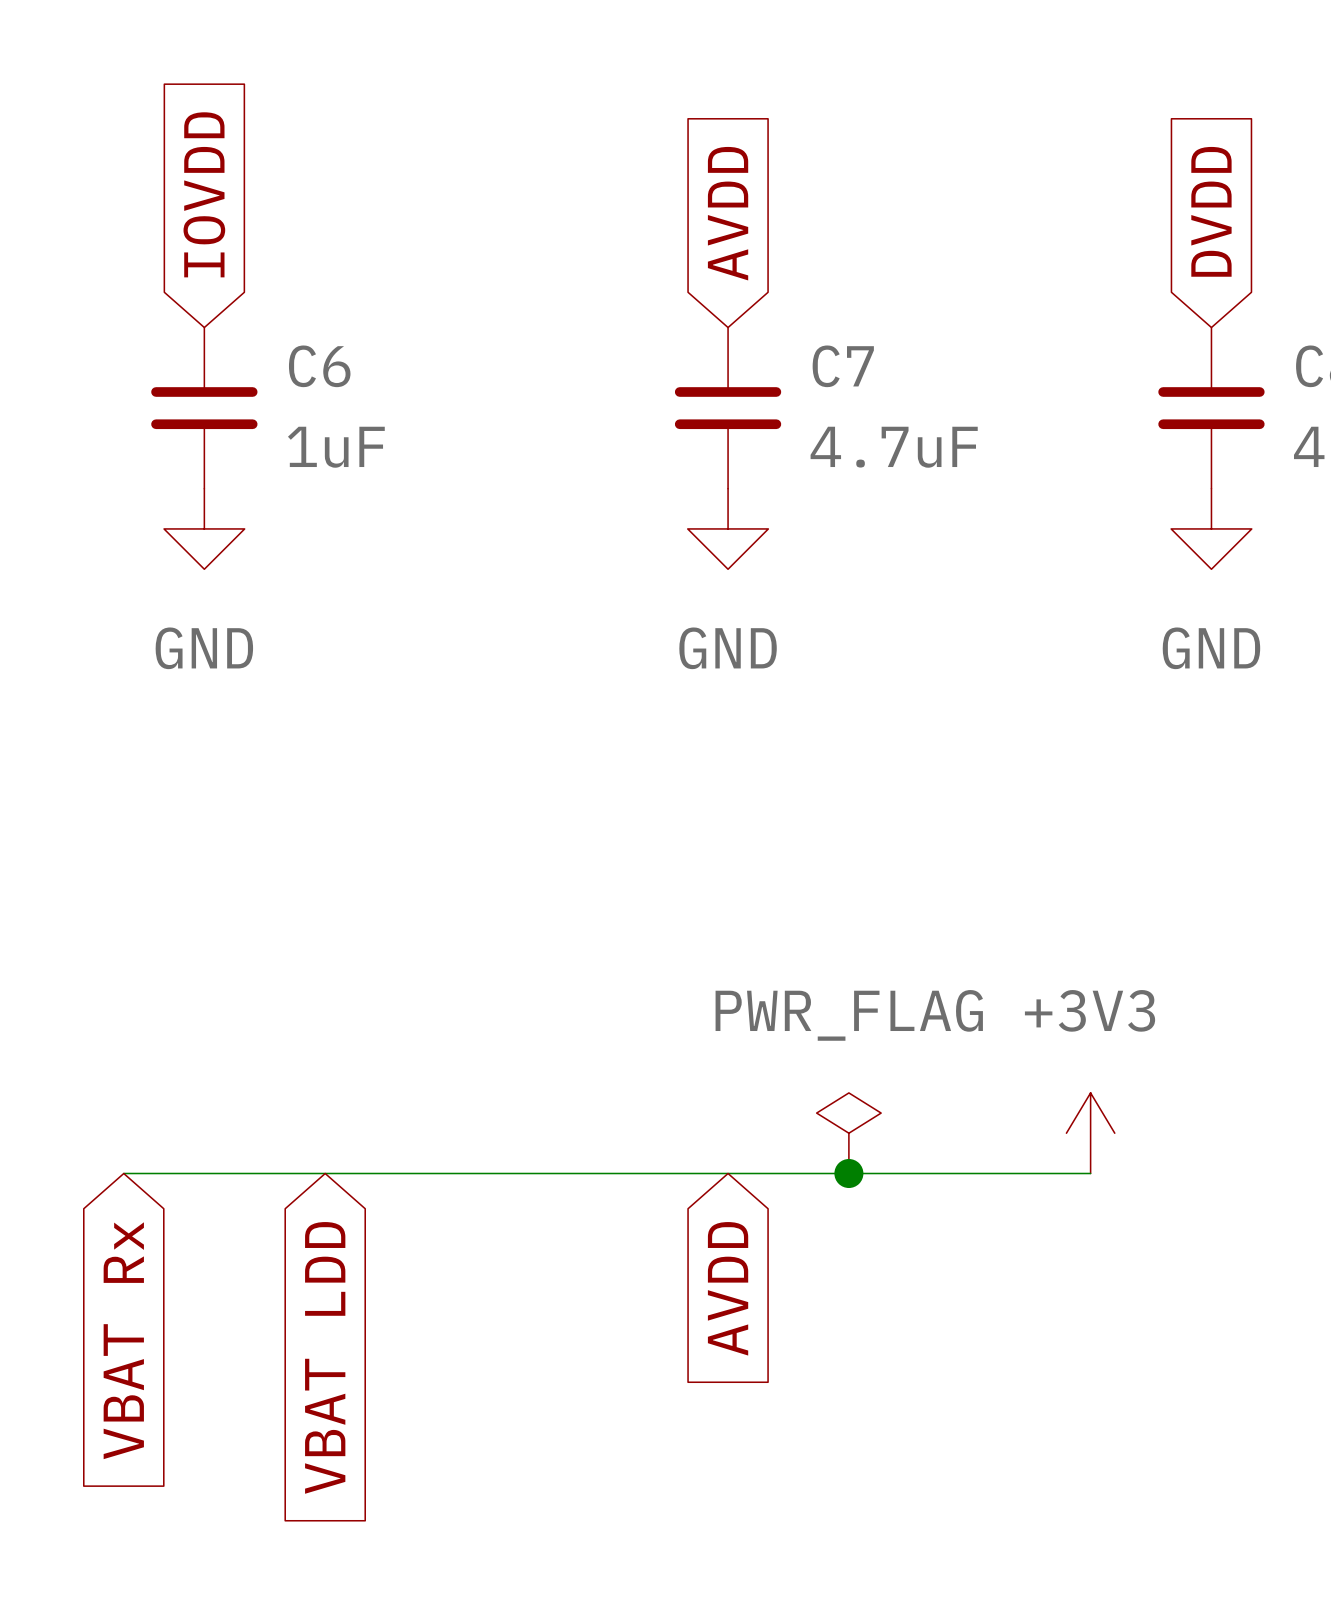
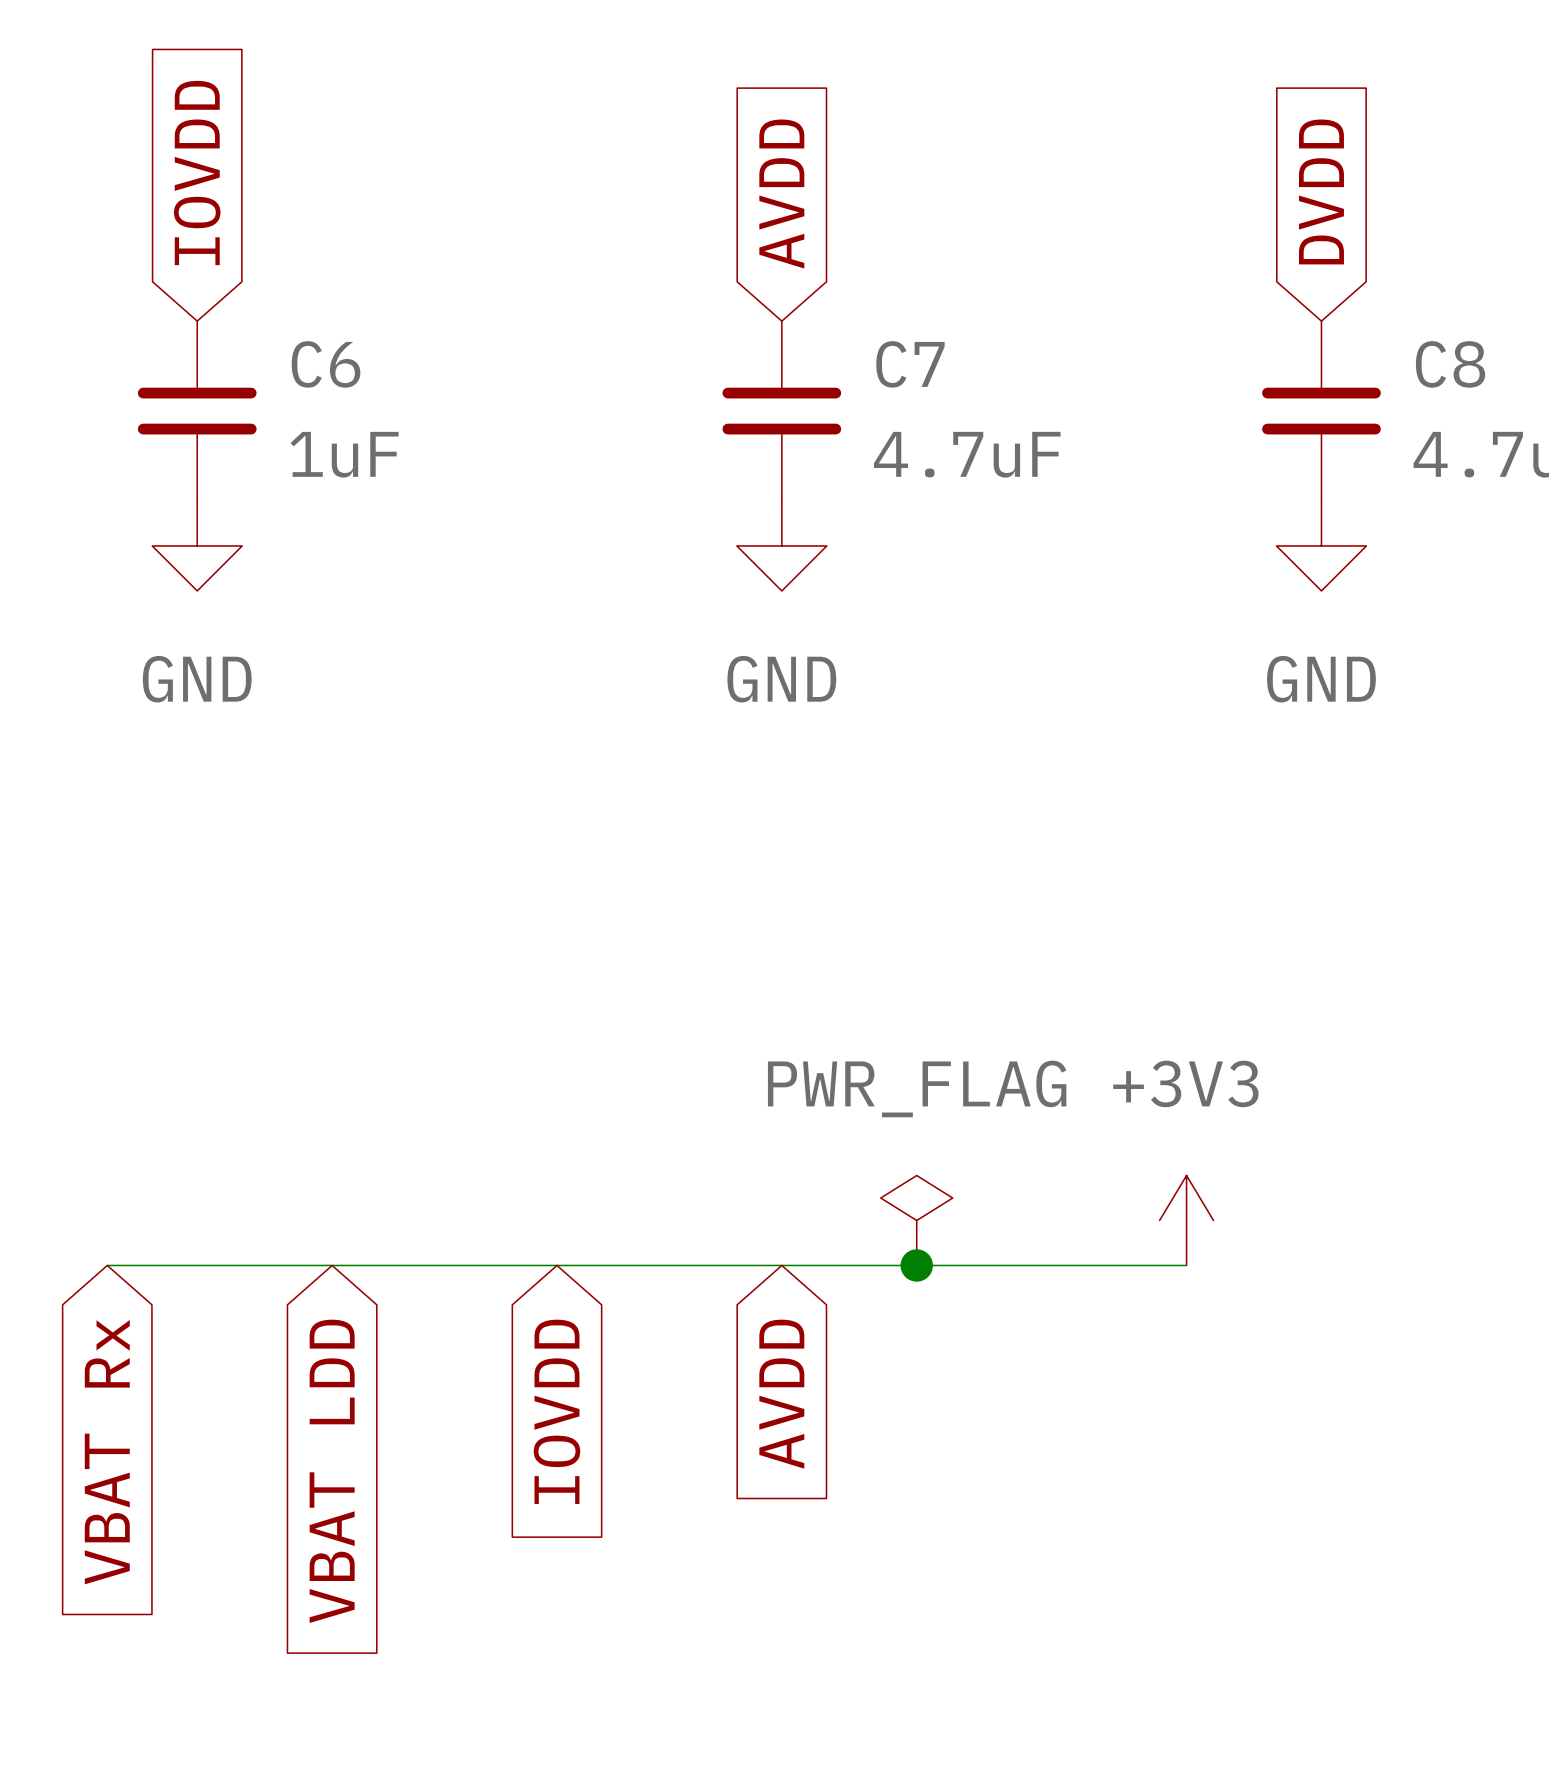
global label: none -> IOVDD (556, 1411)

